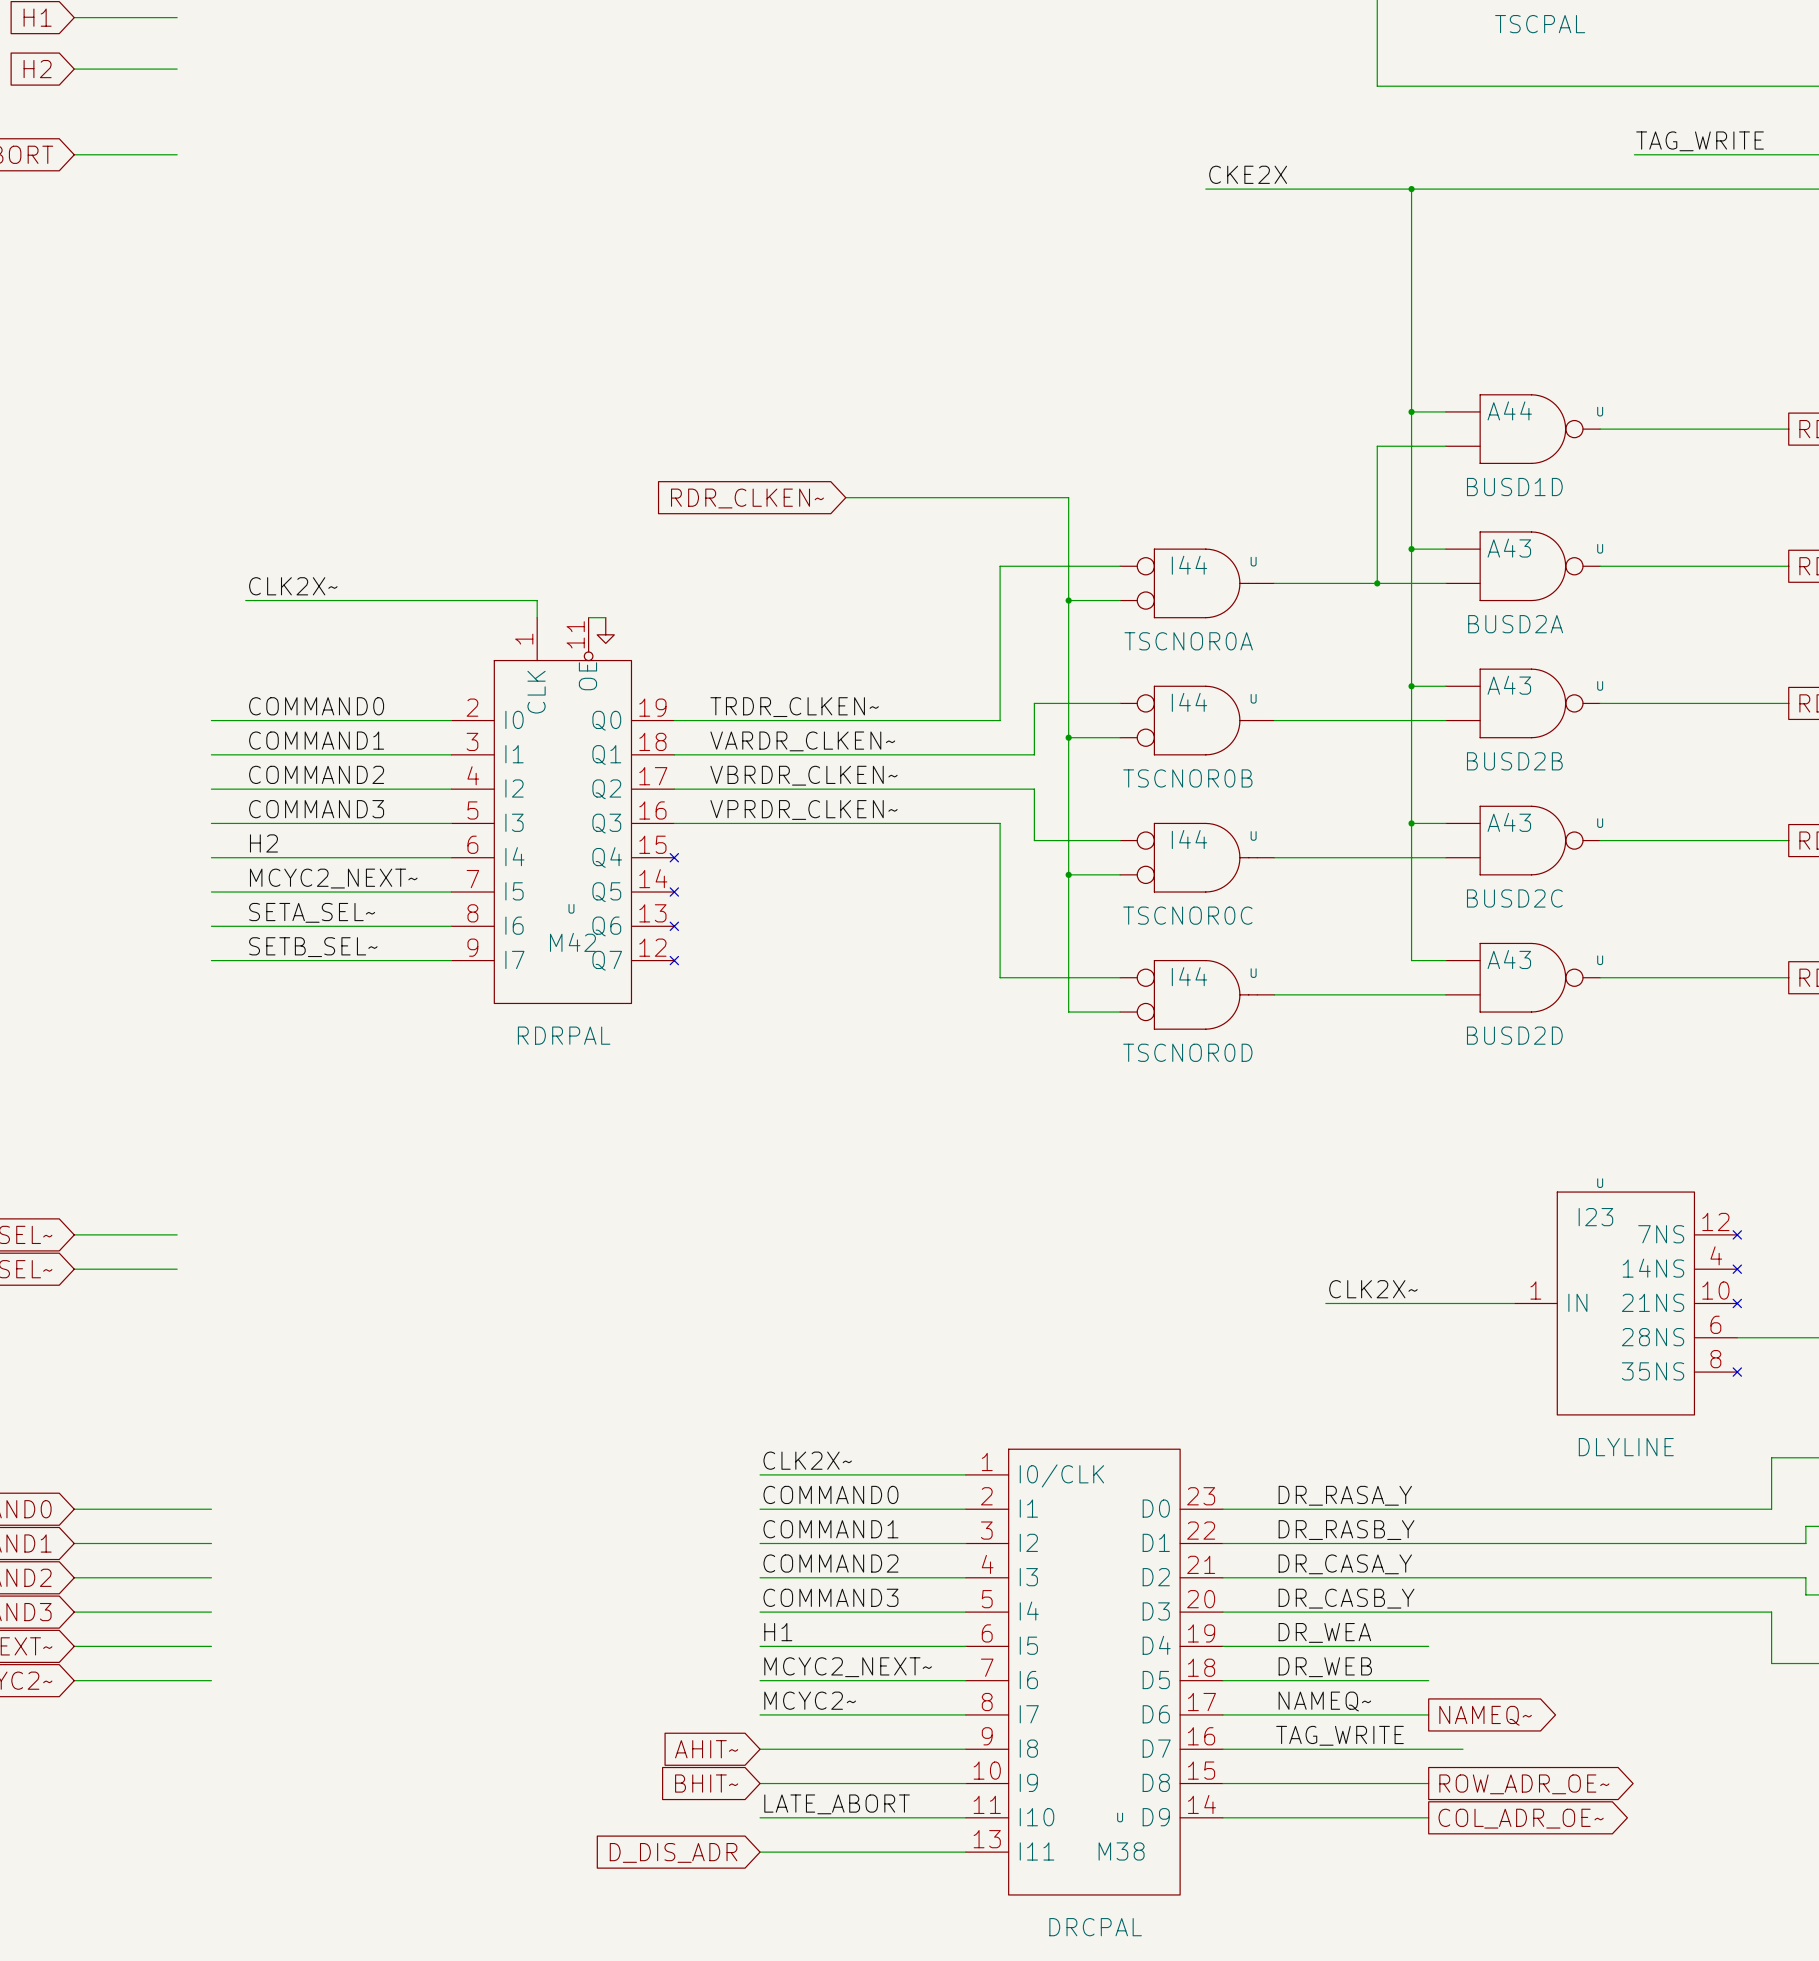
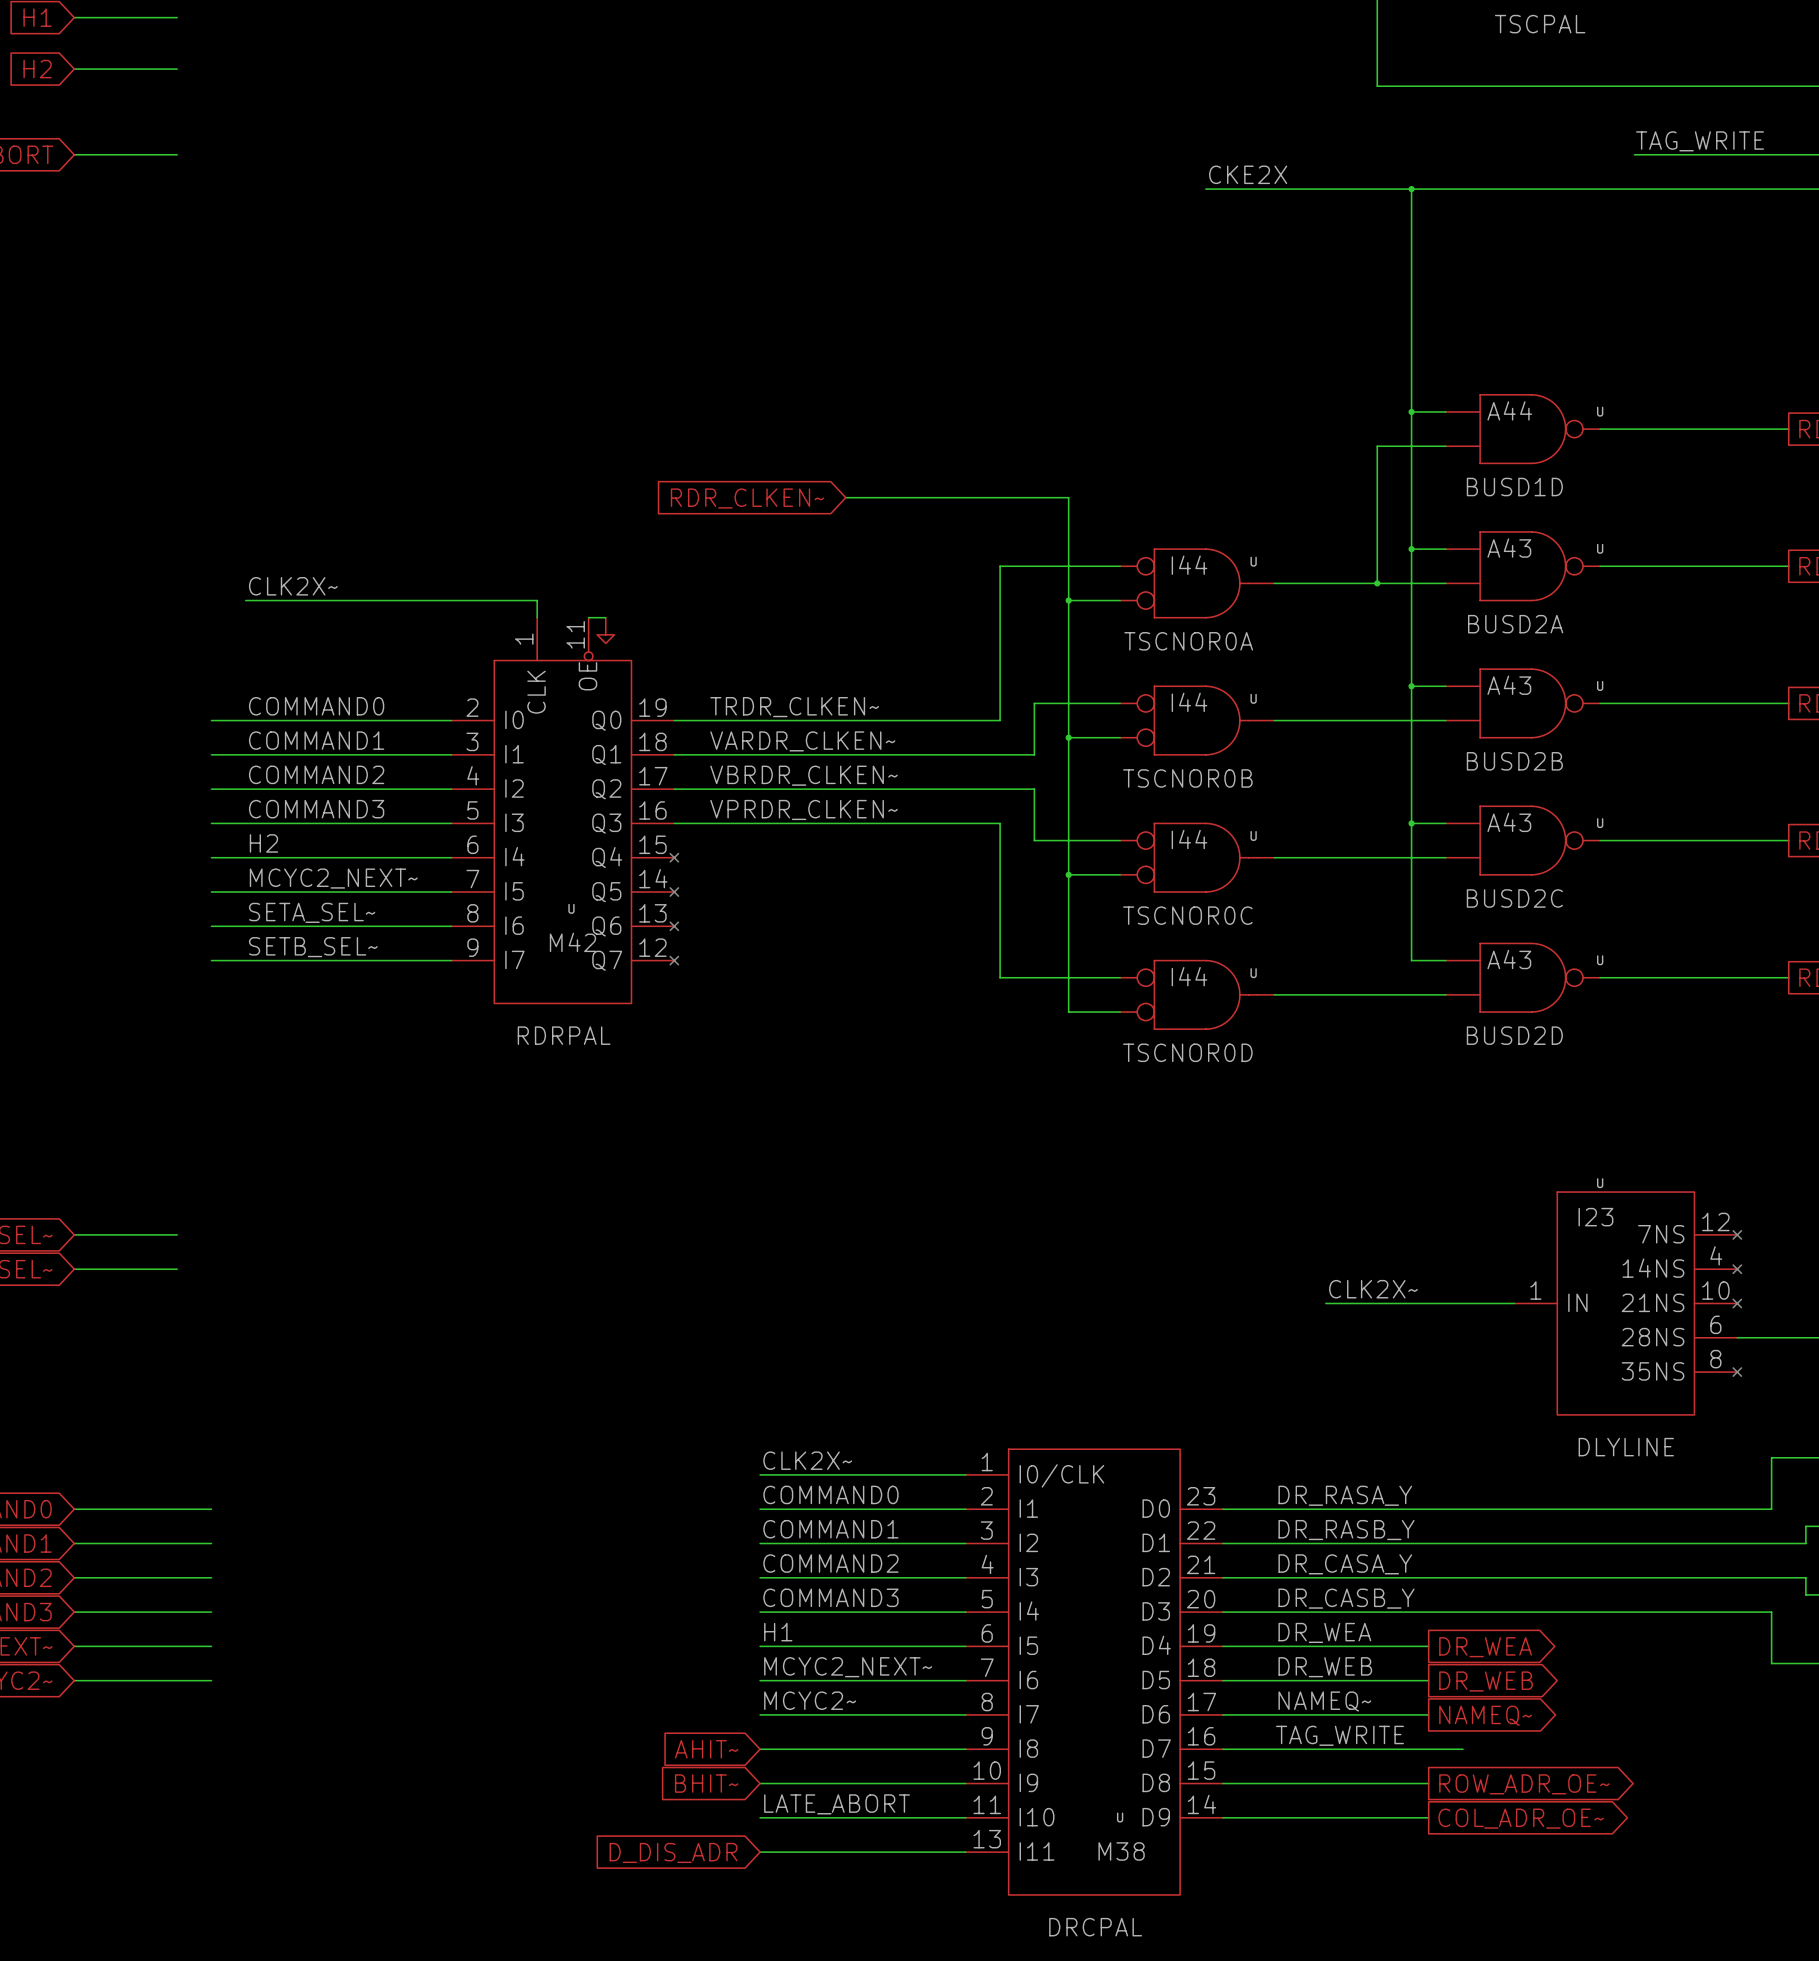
global label: none -> DR_WEA (1485, 1647)
global label: none -> DR_WEB (1486, 1681)

